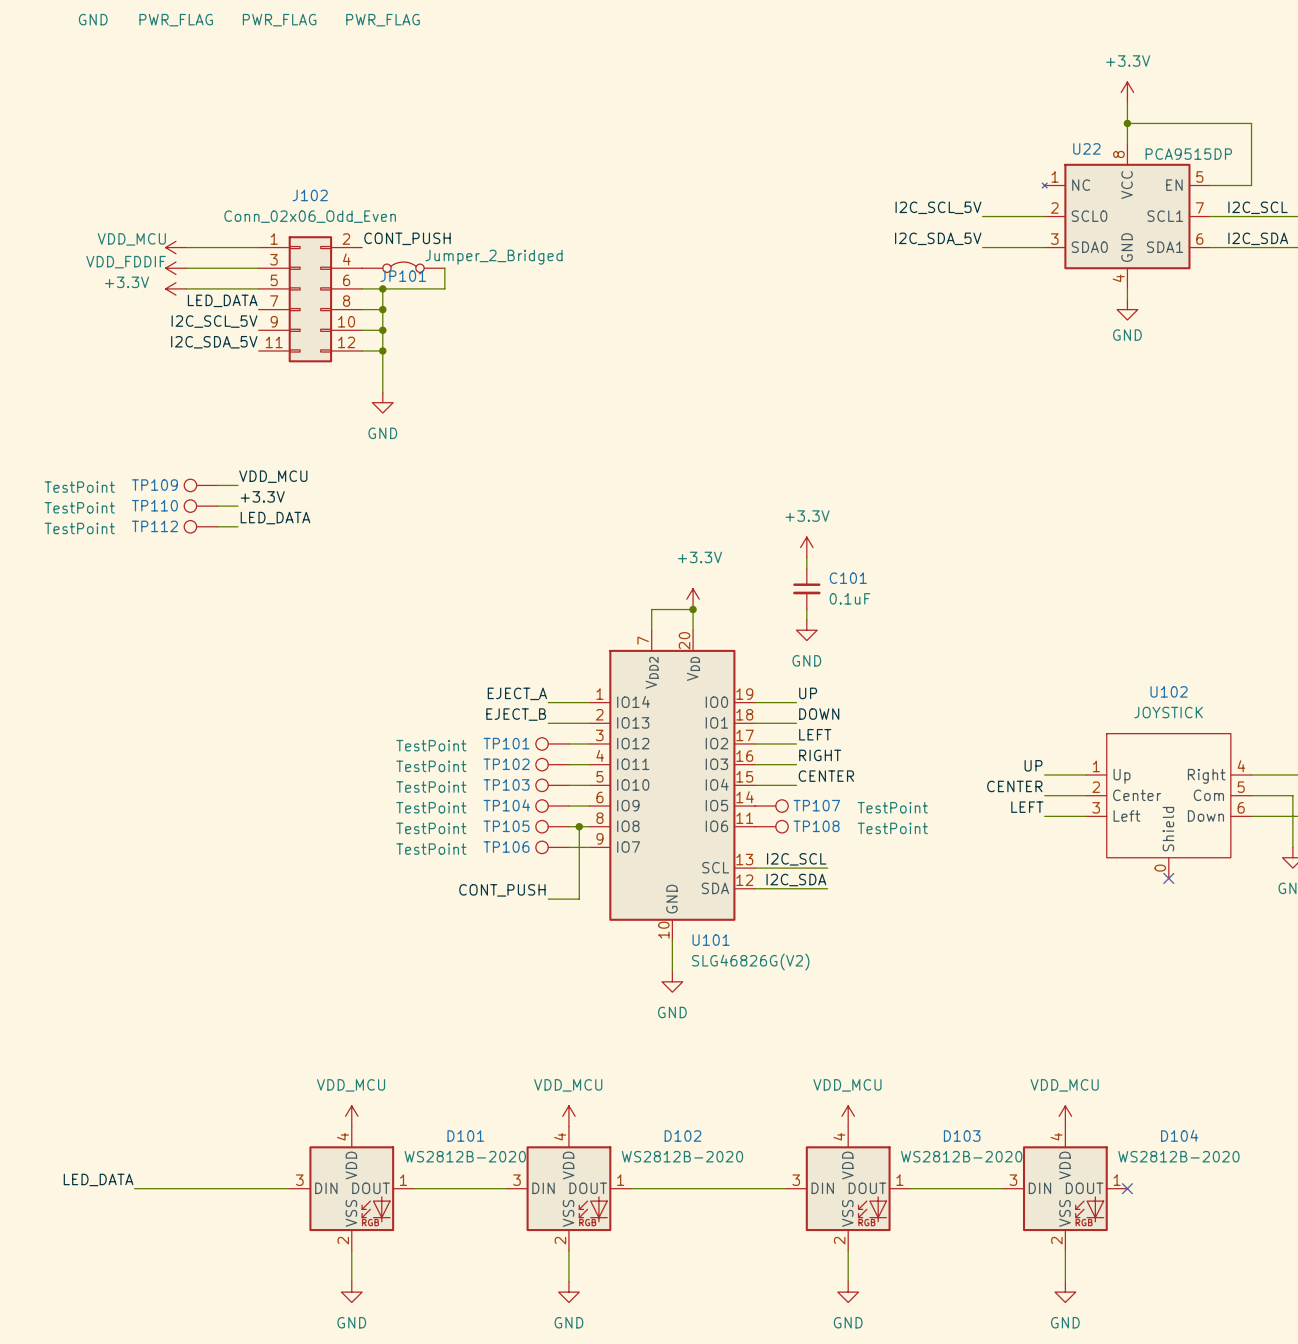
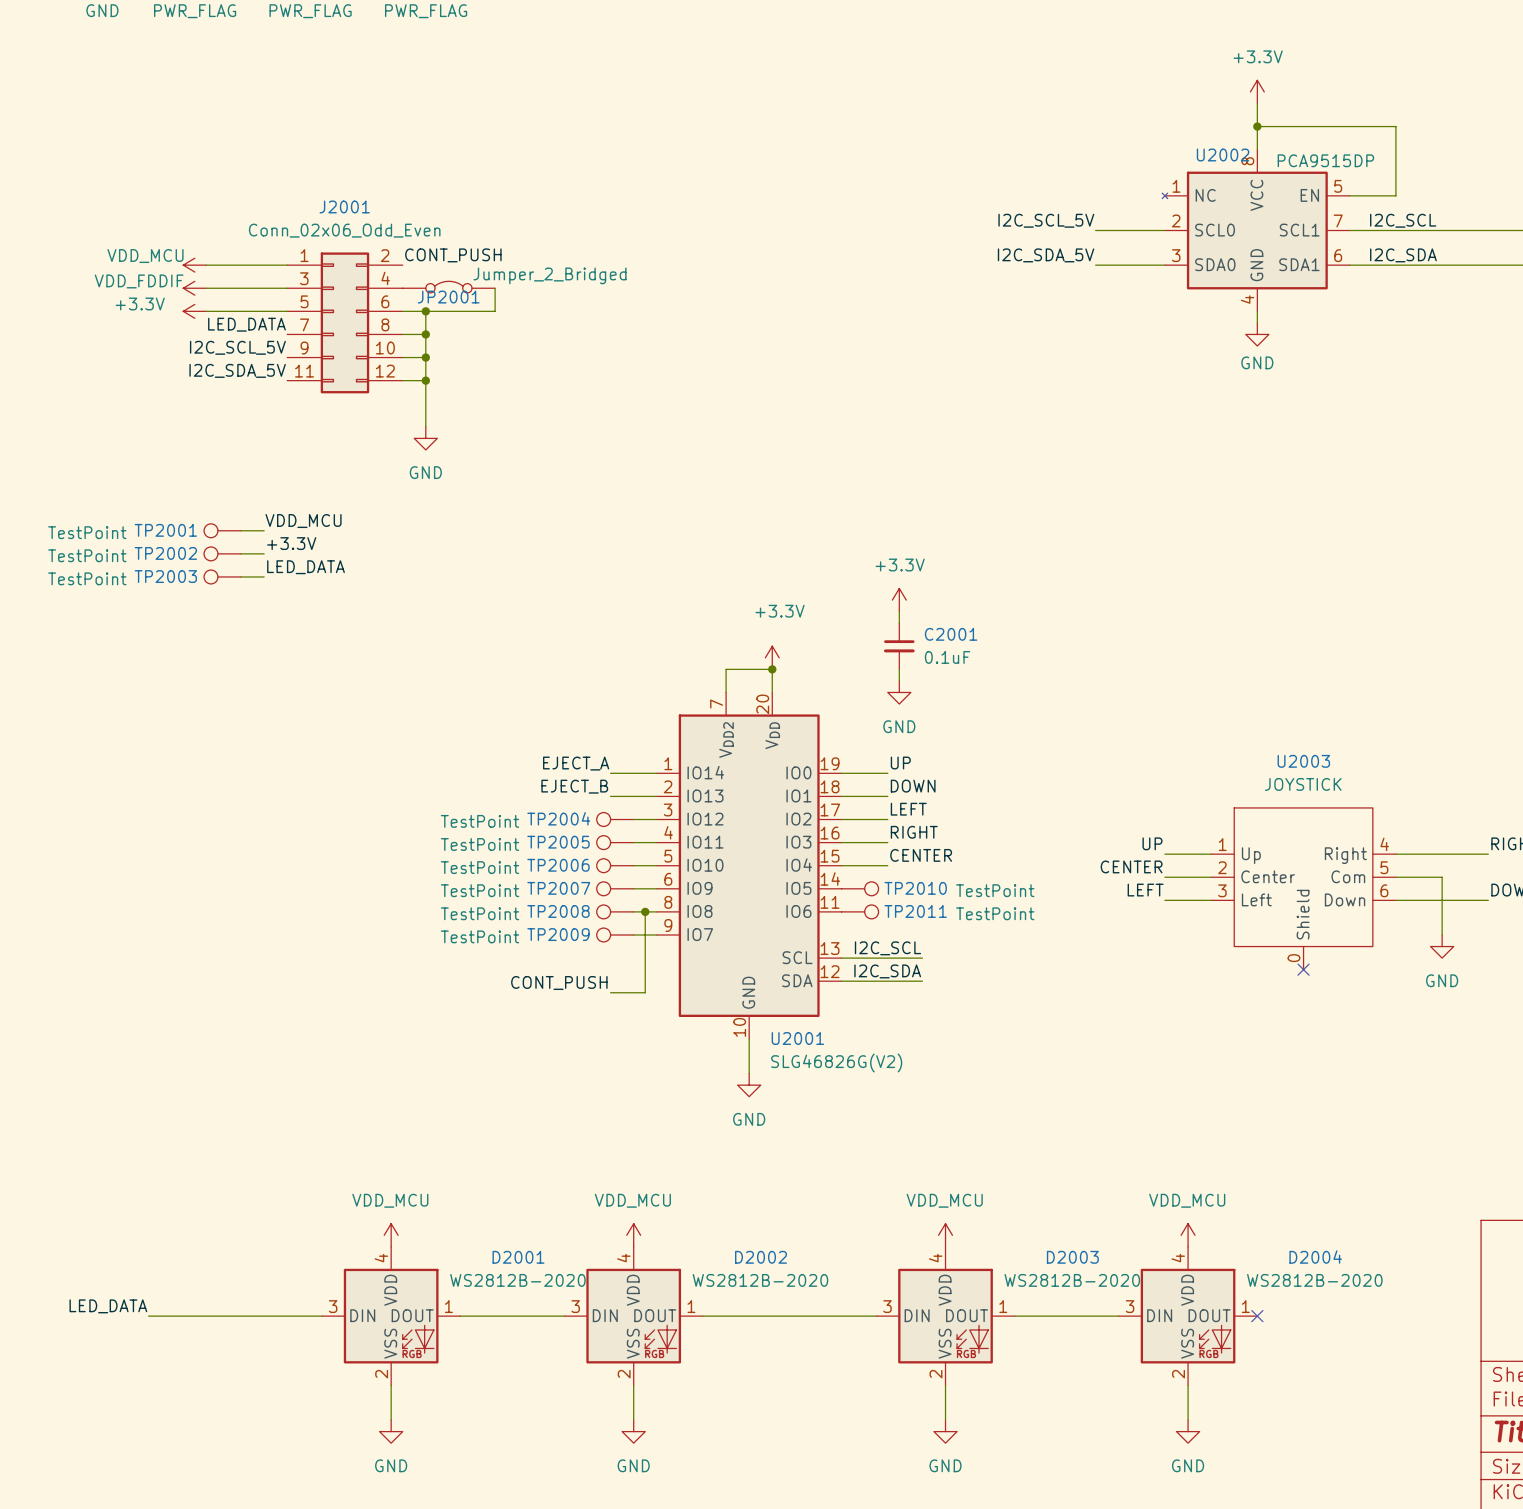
U22 name: U22 (1086, 148) -> U2002 (1223, 155)
J102 name: J102 (310, 195) -> J2001 (344, 206)
JP101 name: JP101 (403, 276) -> JP2001 (448, 297)
TP109 name: TP109 (154, 485) -> TP2001 (165, 530)
TP110 name: TP110 (154, 505) -> TP2002 (165, 553)
TP112 name: TP112 (154, 526) -> TP2003 (165, 576)
C101 name: C101 (848, 578) -> C2001 (951, 634)
U102 name: U102 (1169, 691) -> U2003 (1303, 761)
TP101 name: TP101 (506, 743) -> TP2004 (558, 818)
TP102 name: TP102 (506, 764) -> TP2005 (558, 842)
TP103 name: TP103 (506, 784) -> TP2006 (558, 865)
TP104 name: TP104 (506, 805) -> TP2007 (558, 888)
TP107 name: TP107 (816, 805) -> TP2010 (915, 888)
TP105 name: TP105 (506, 826) -> TP2008 (558, 911)
TP108 name: TP108 (816, 826) -> TP2011 (915, 911)
TP106 name: TP106 (506, 847) -> TP2009 (558, 934)
U101 name: U101 (711, 940) -> U2001 (797, 1038)
D104 name: D104 (1179, 1135) -> D2004 (1315, 1257)
D101 name: D101 (465, 1136) -> D2001 (518, 1257)
D102 name: D102 (682, 1136) -> D2002 (761, 1257)
D103 name: D103 (962, 1136) -> D2003 (1072, 1257)

